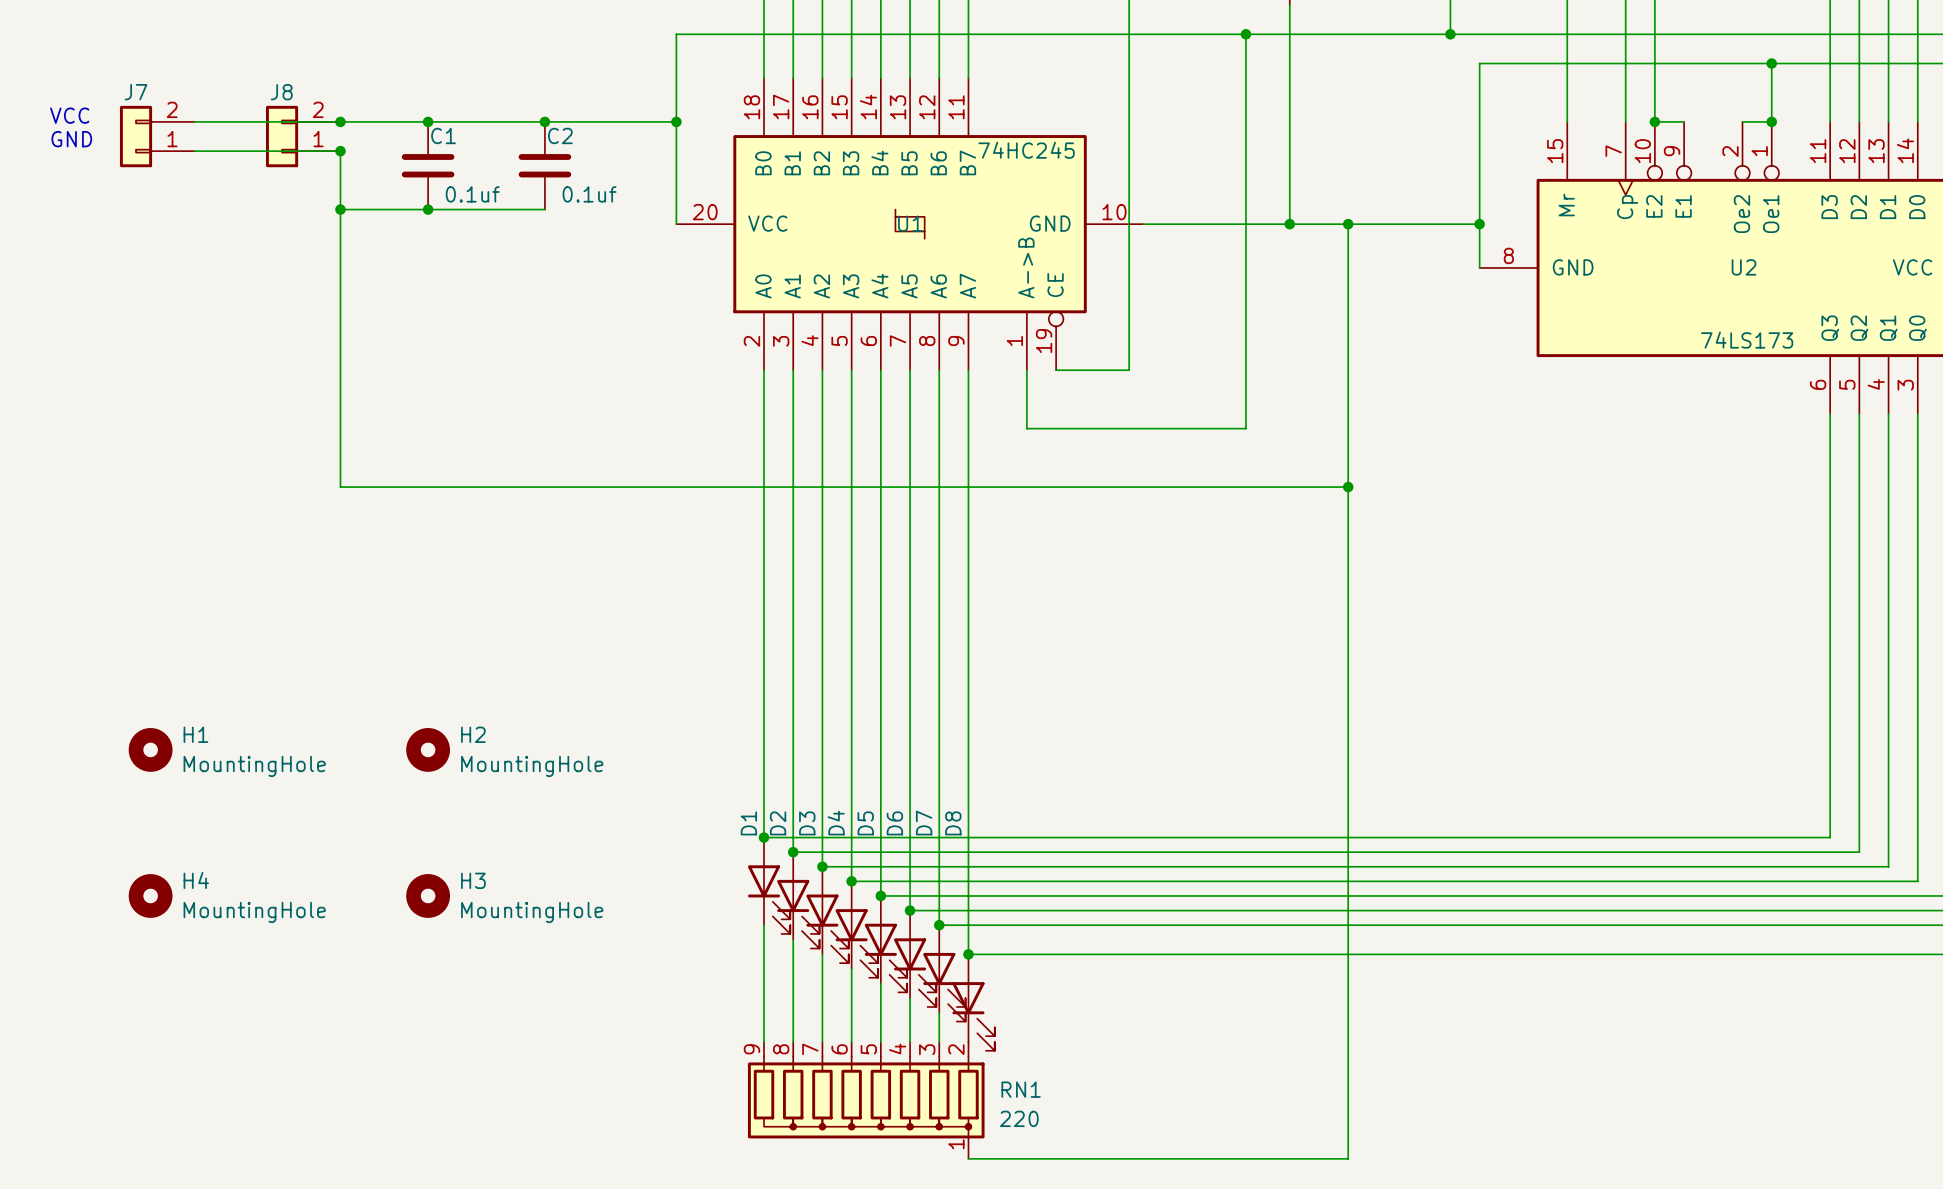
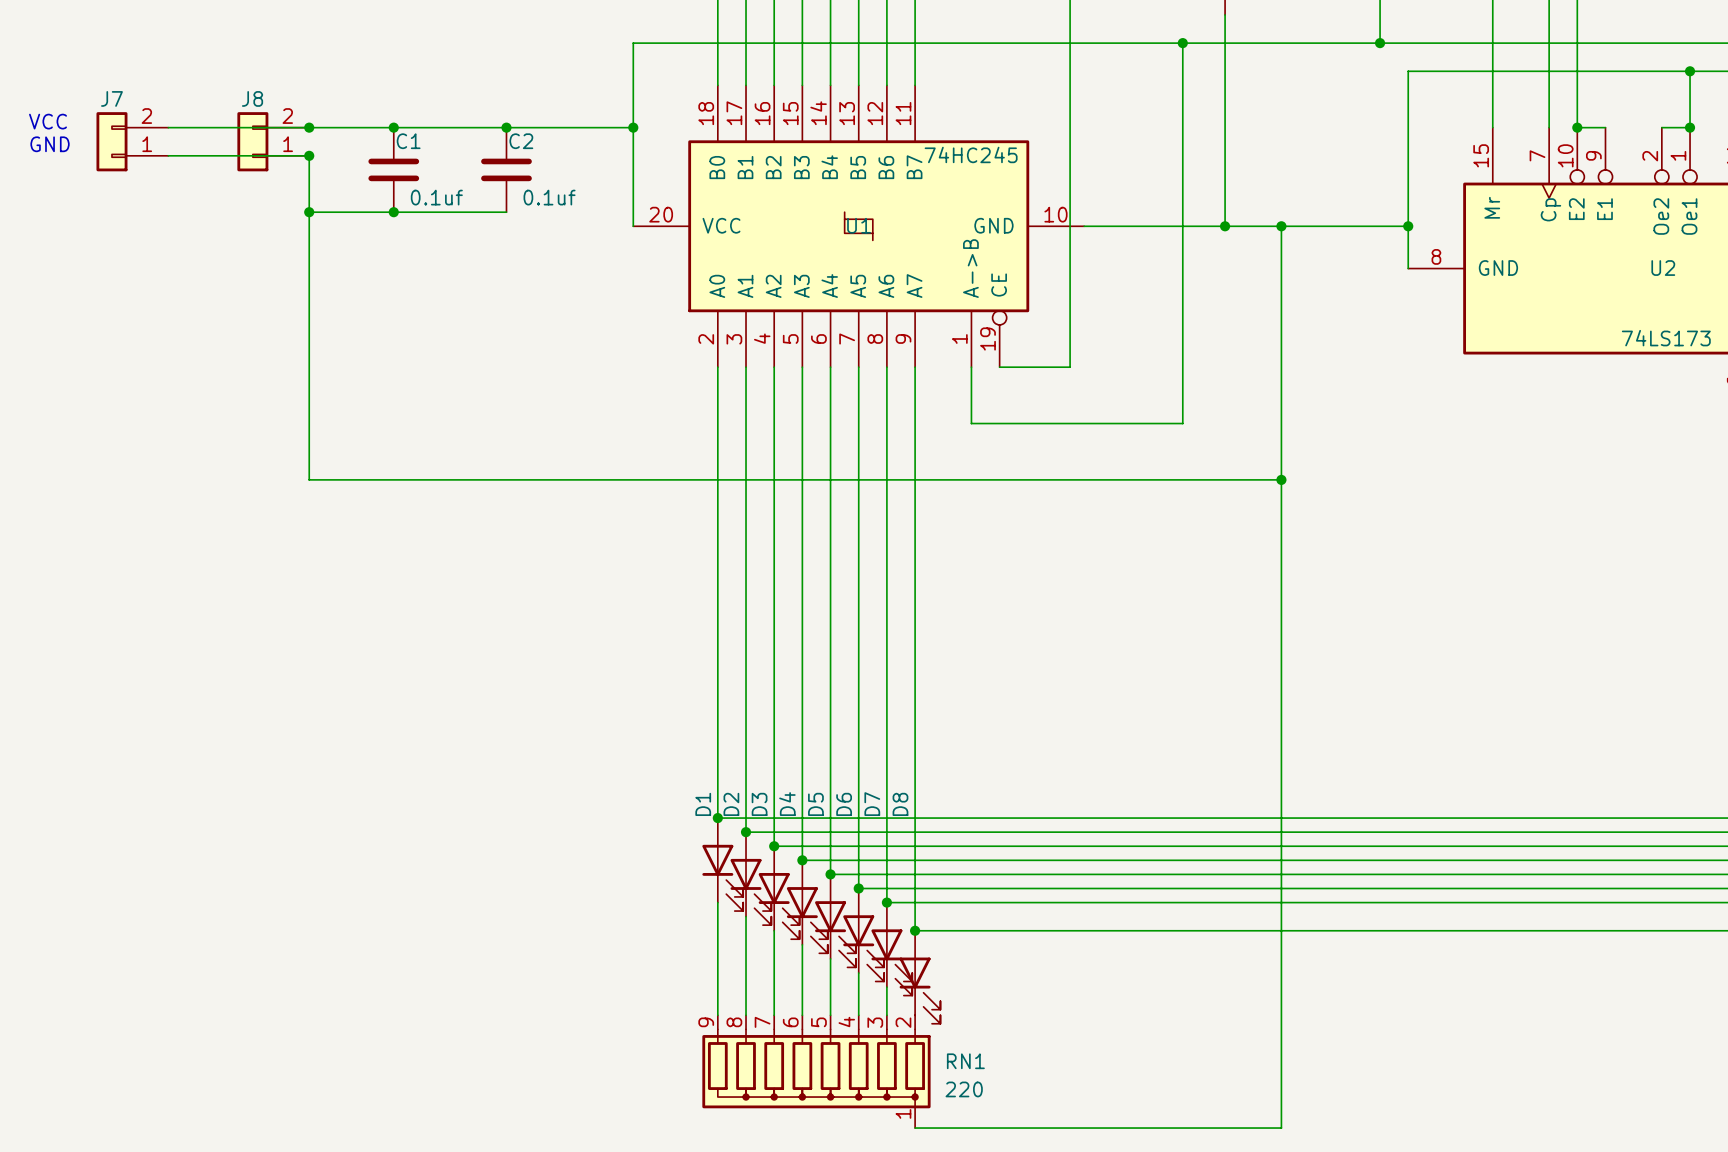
H1: MountingHole (150, 749) -> none
H2: MountingHole (428, 749) -> none
H4: MountingHole (150, 895) -> none
H3: MountingHole (428, 895) -> none

